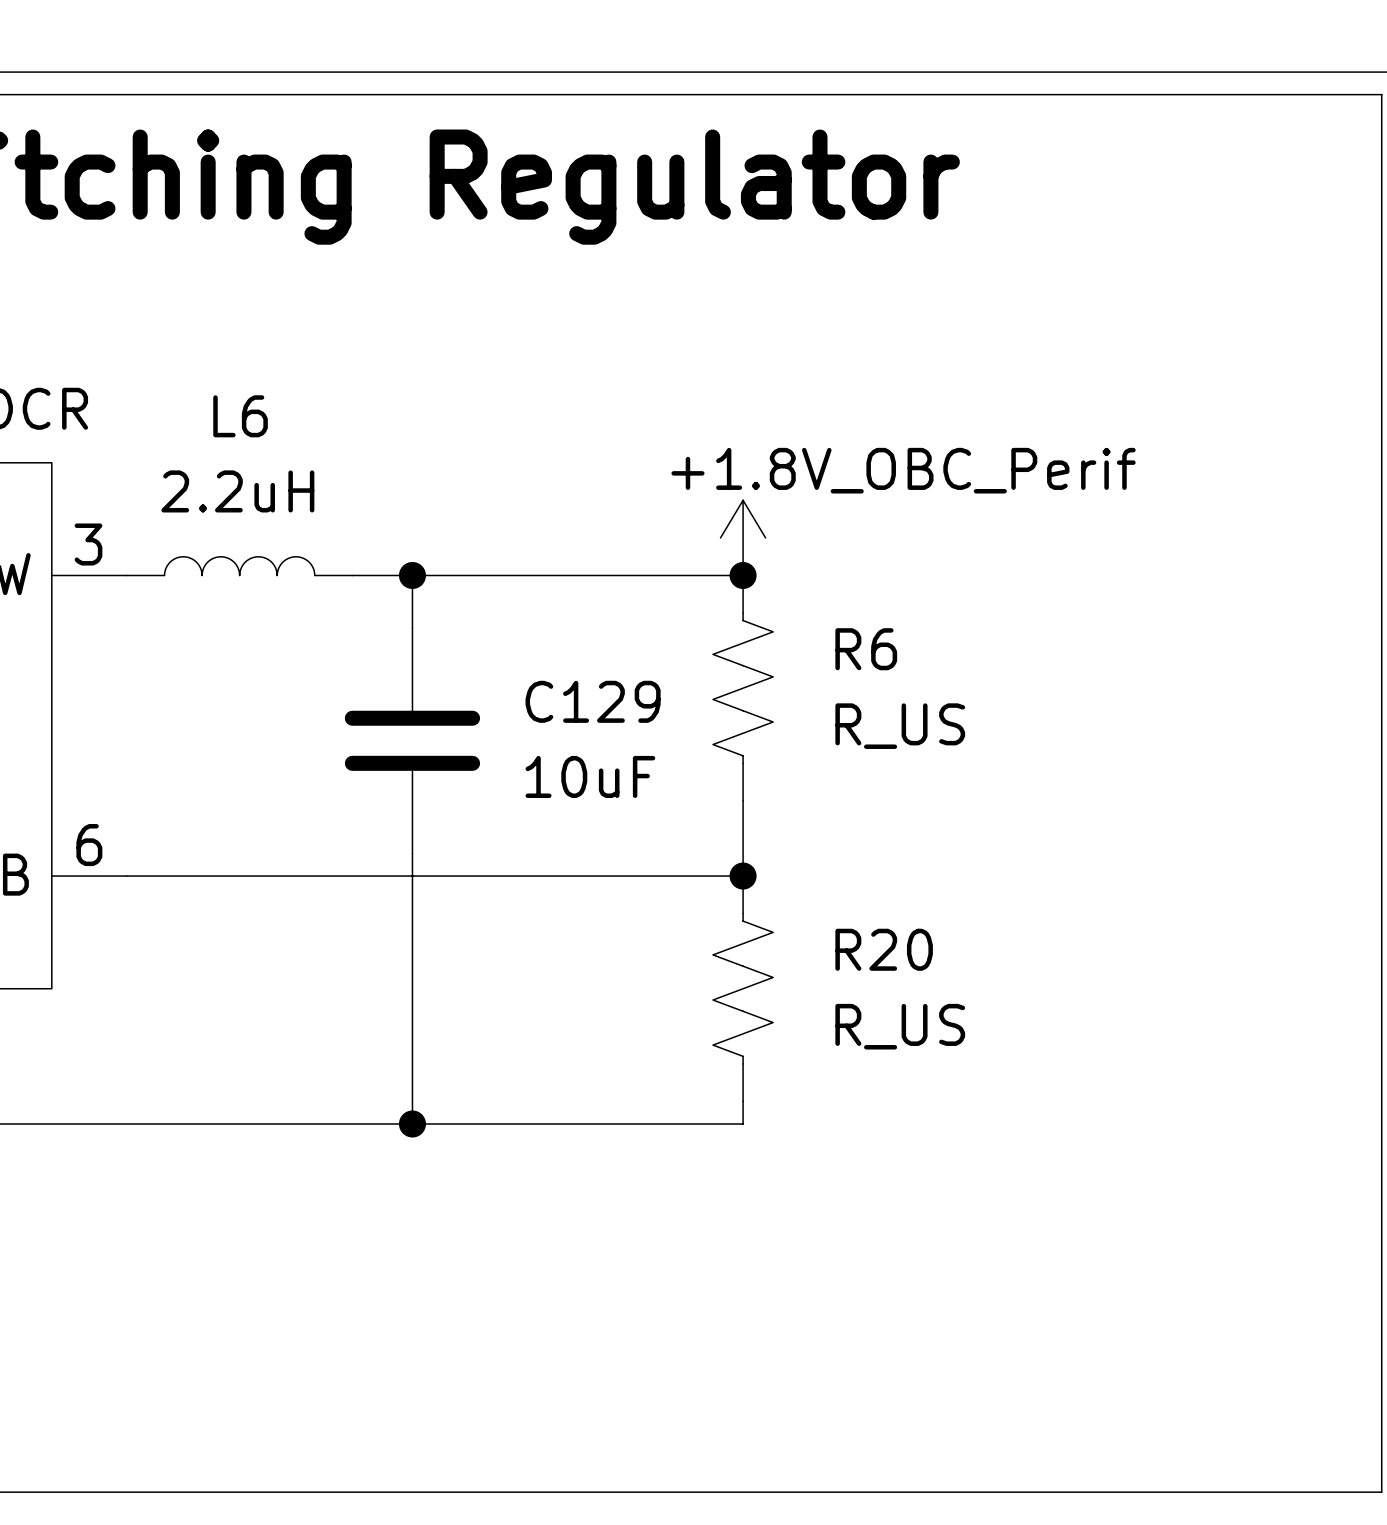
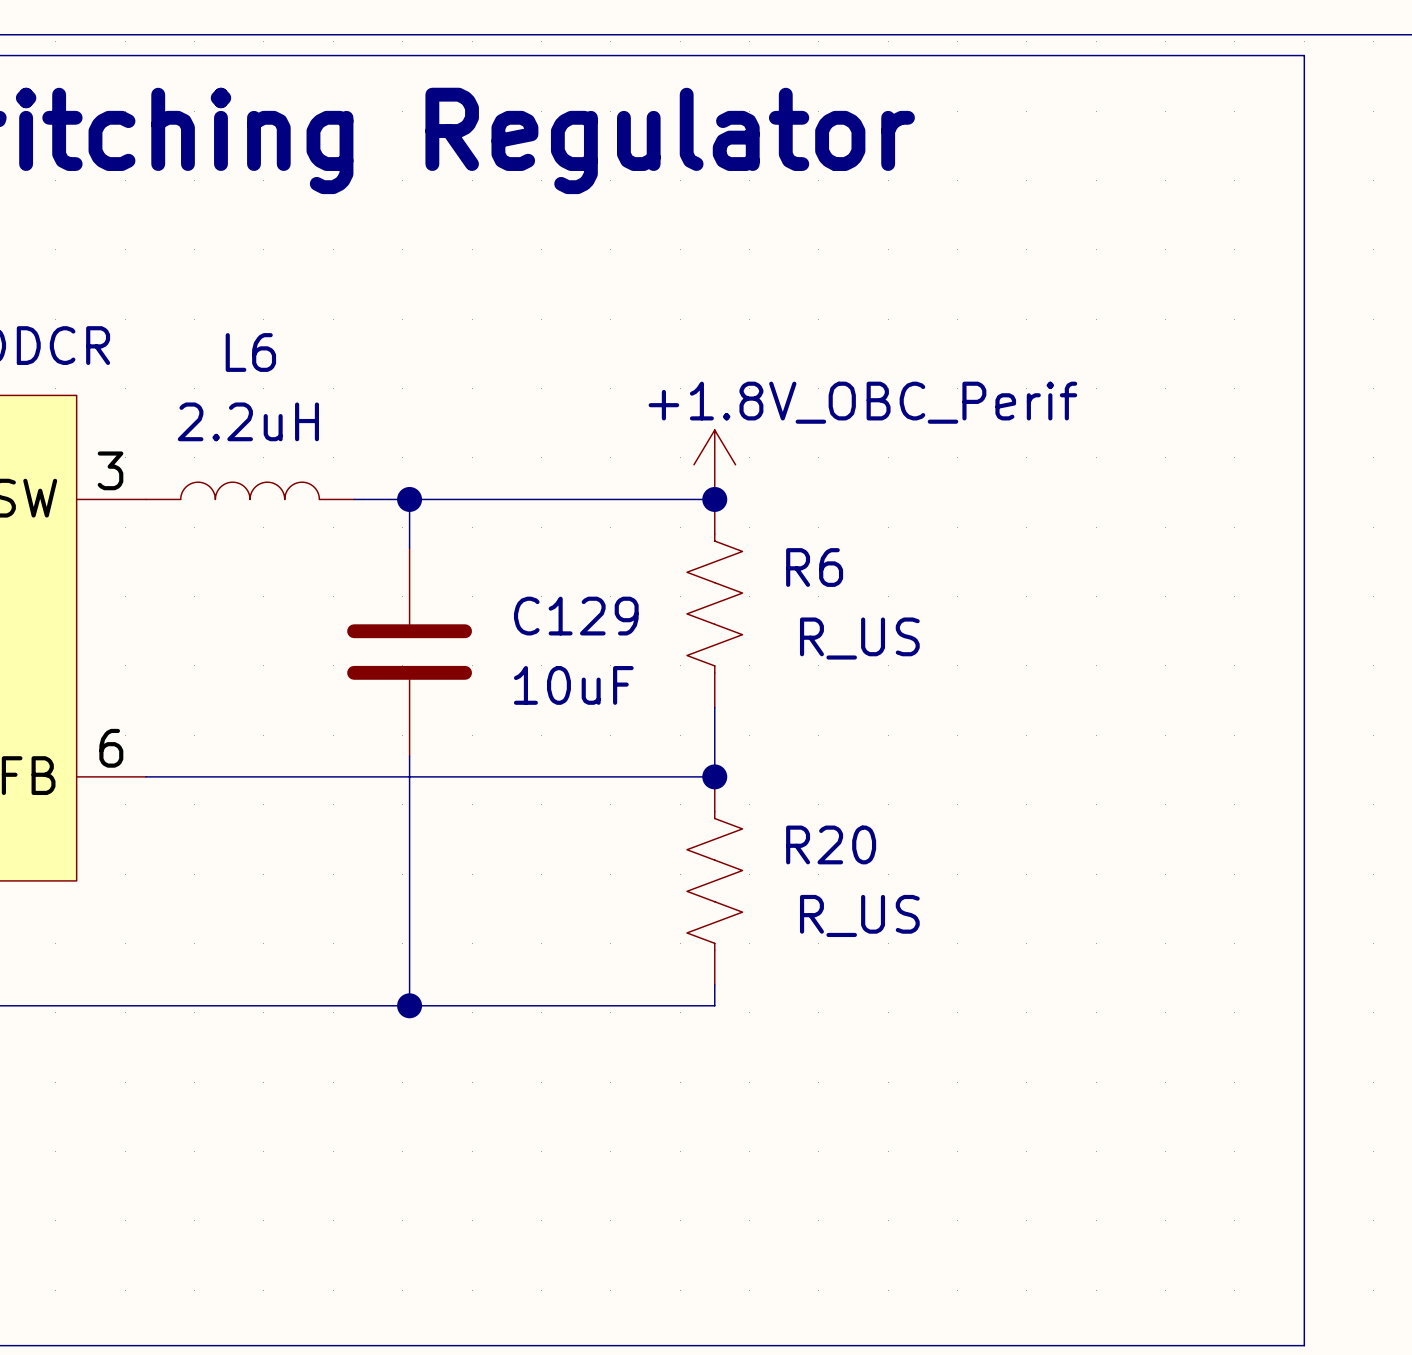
R6 name position: R6 (866, 649) -> R6 (814, 567)
R20 name position: R20 (884, 949) -> R20 (831, 844)

